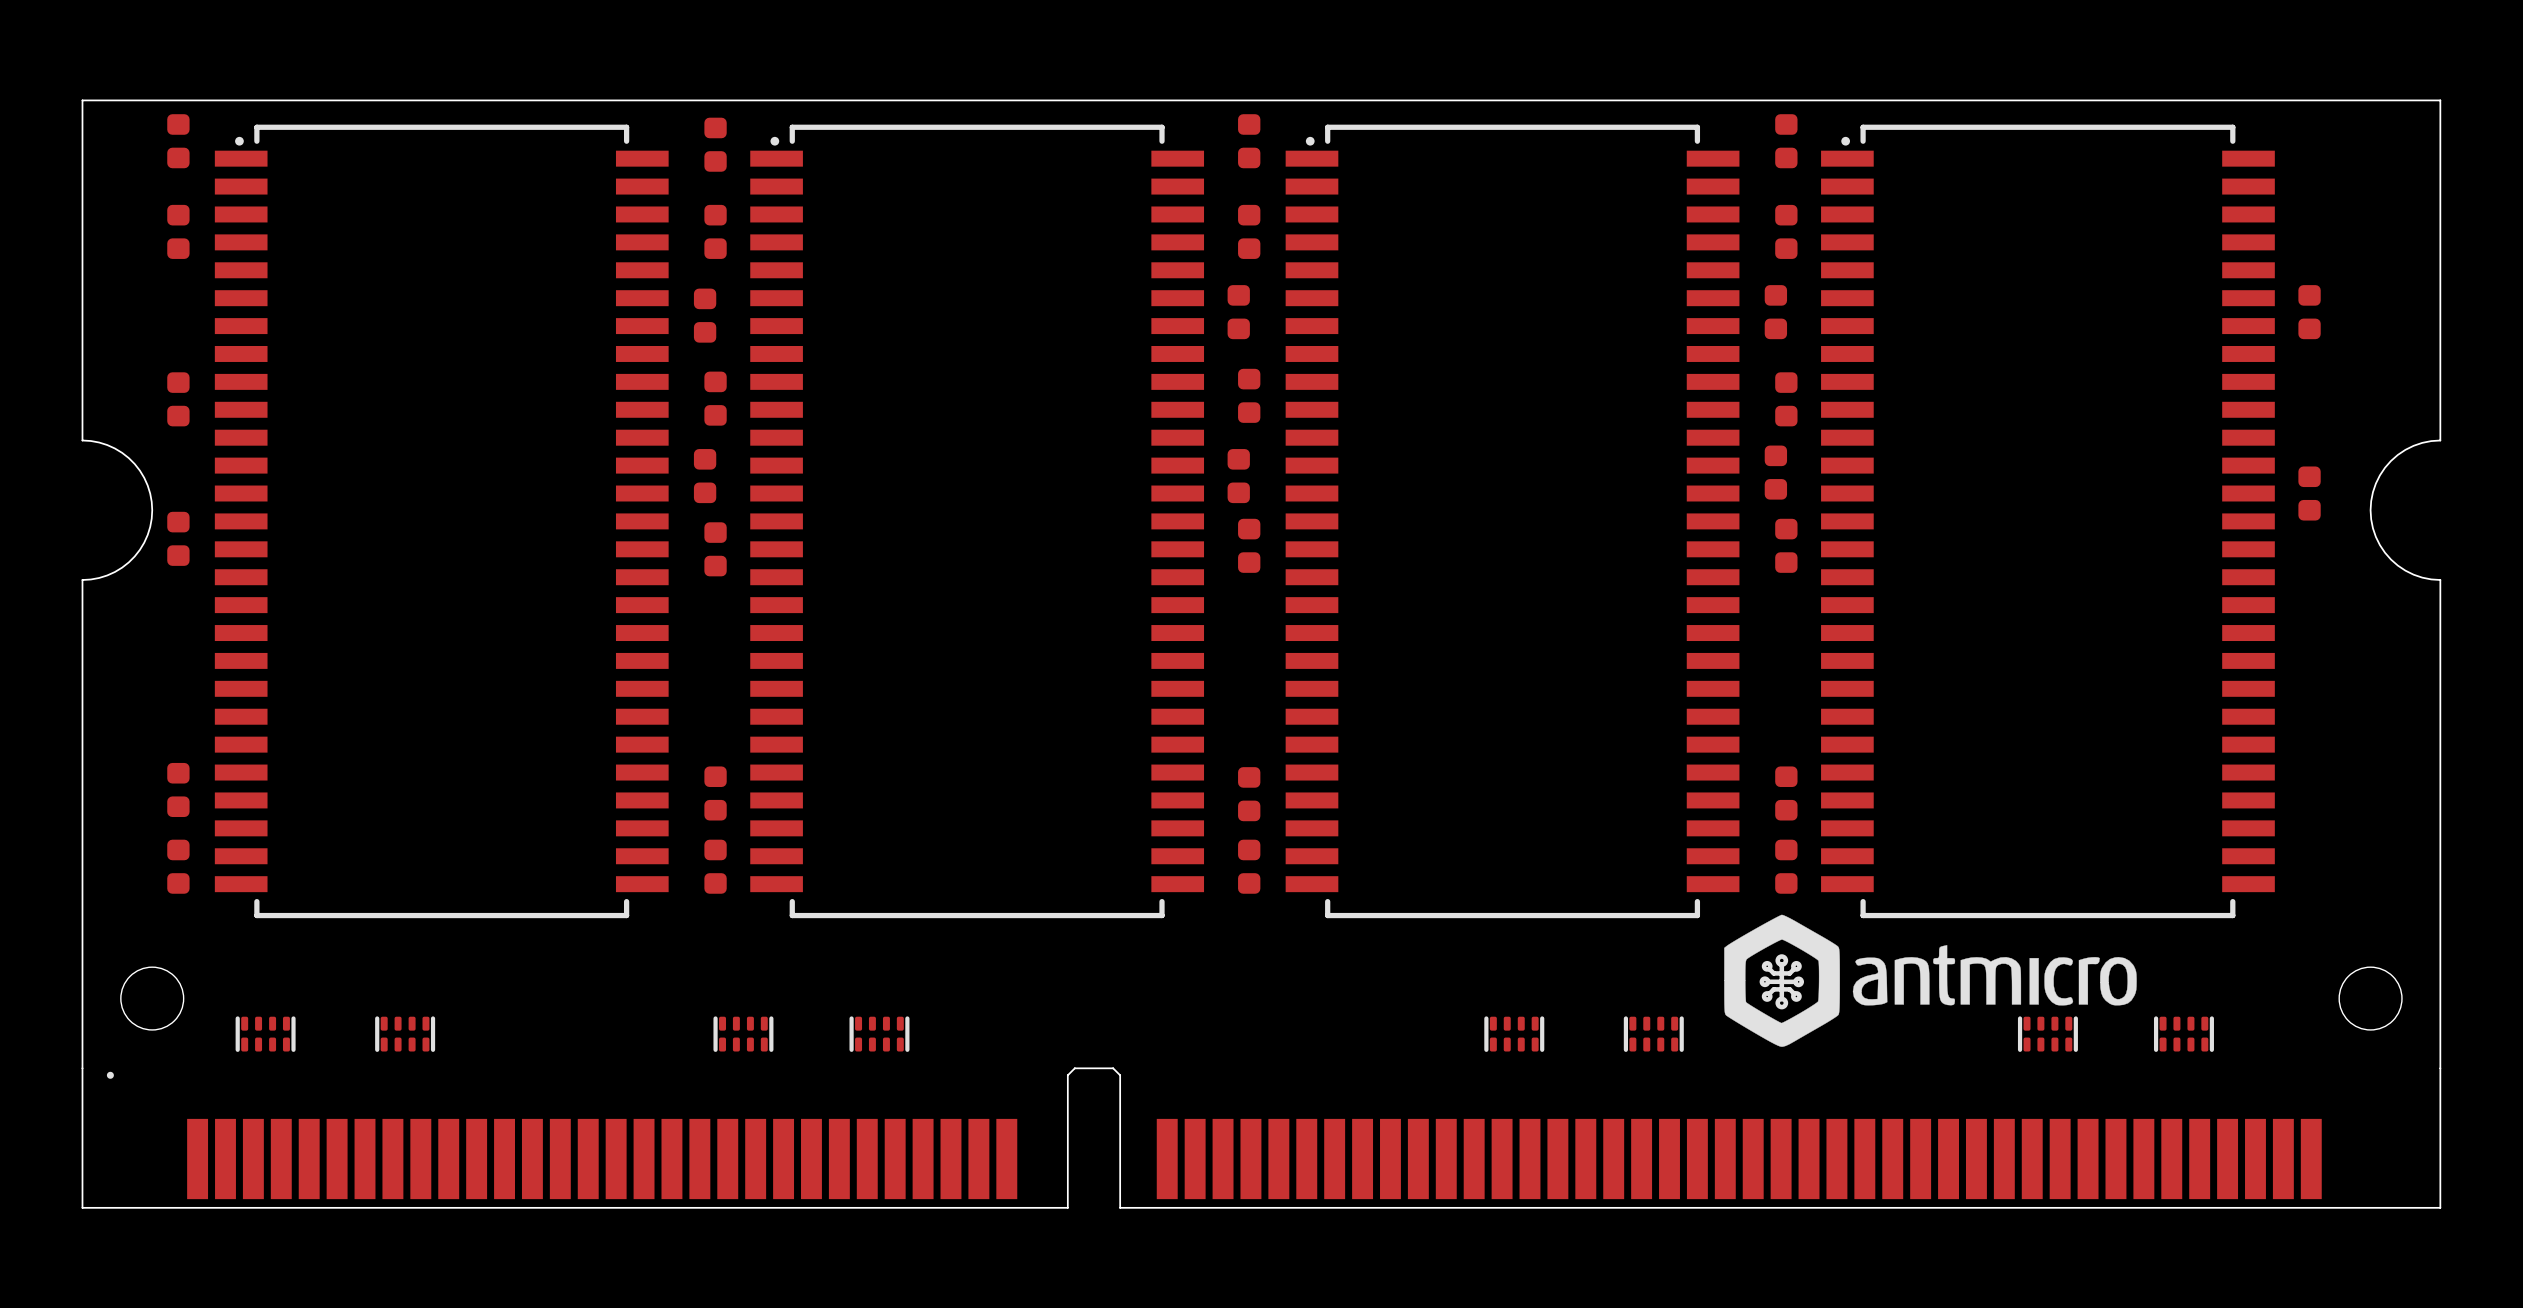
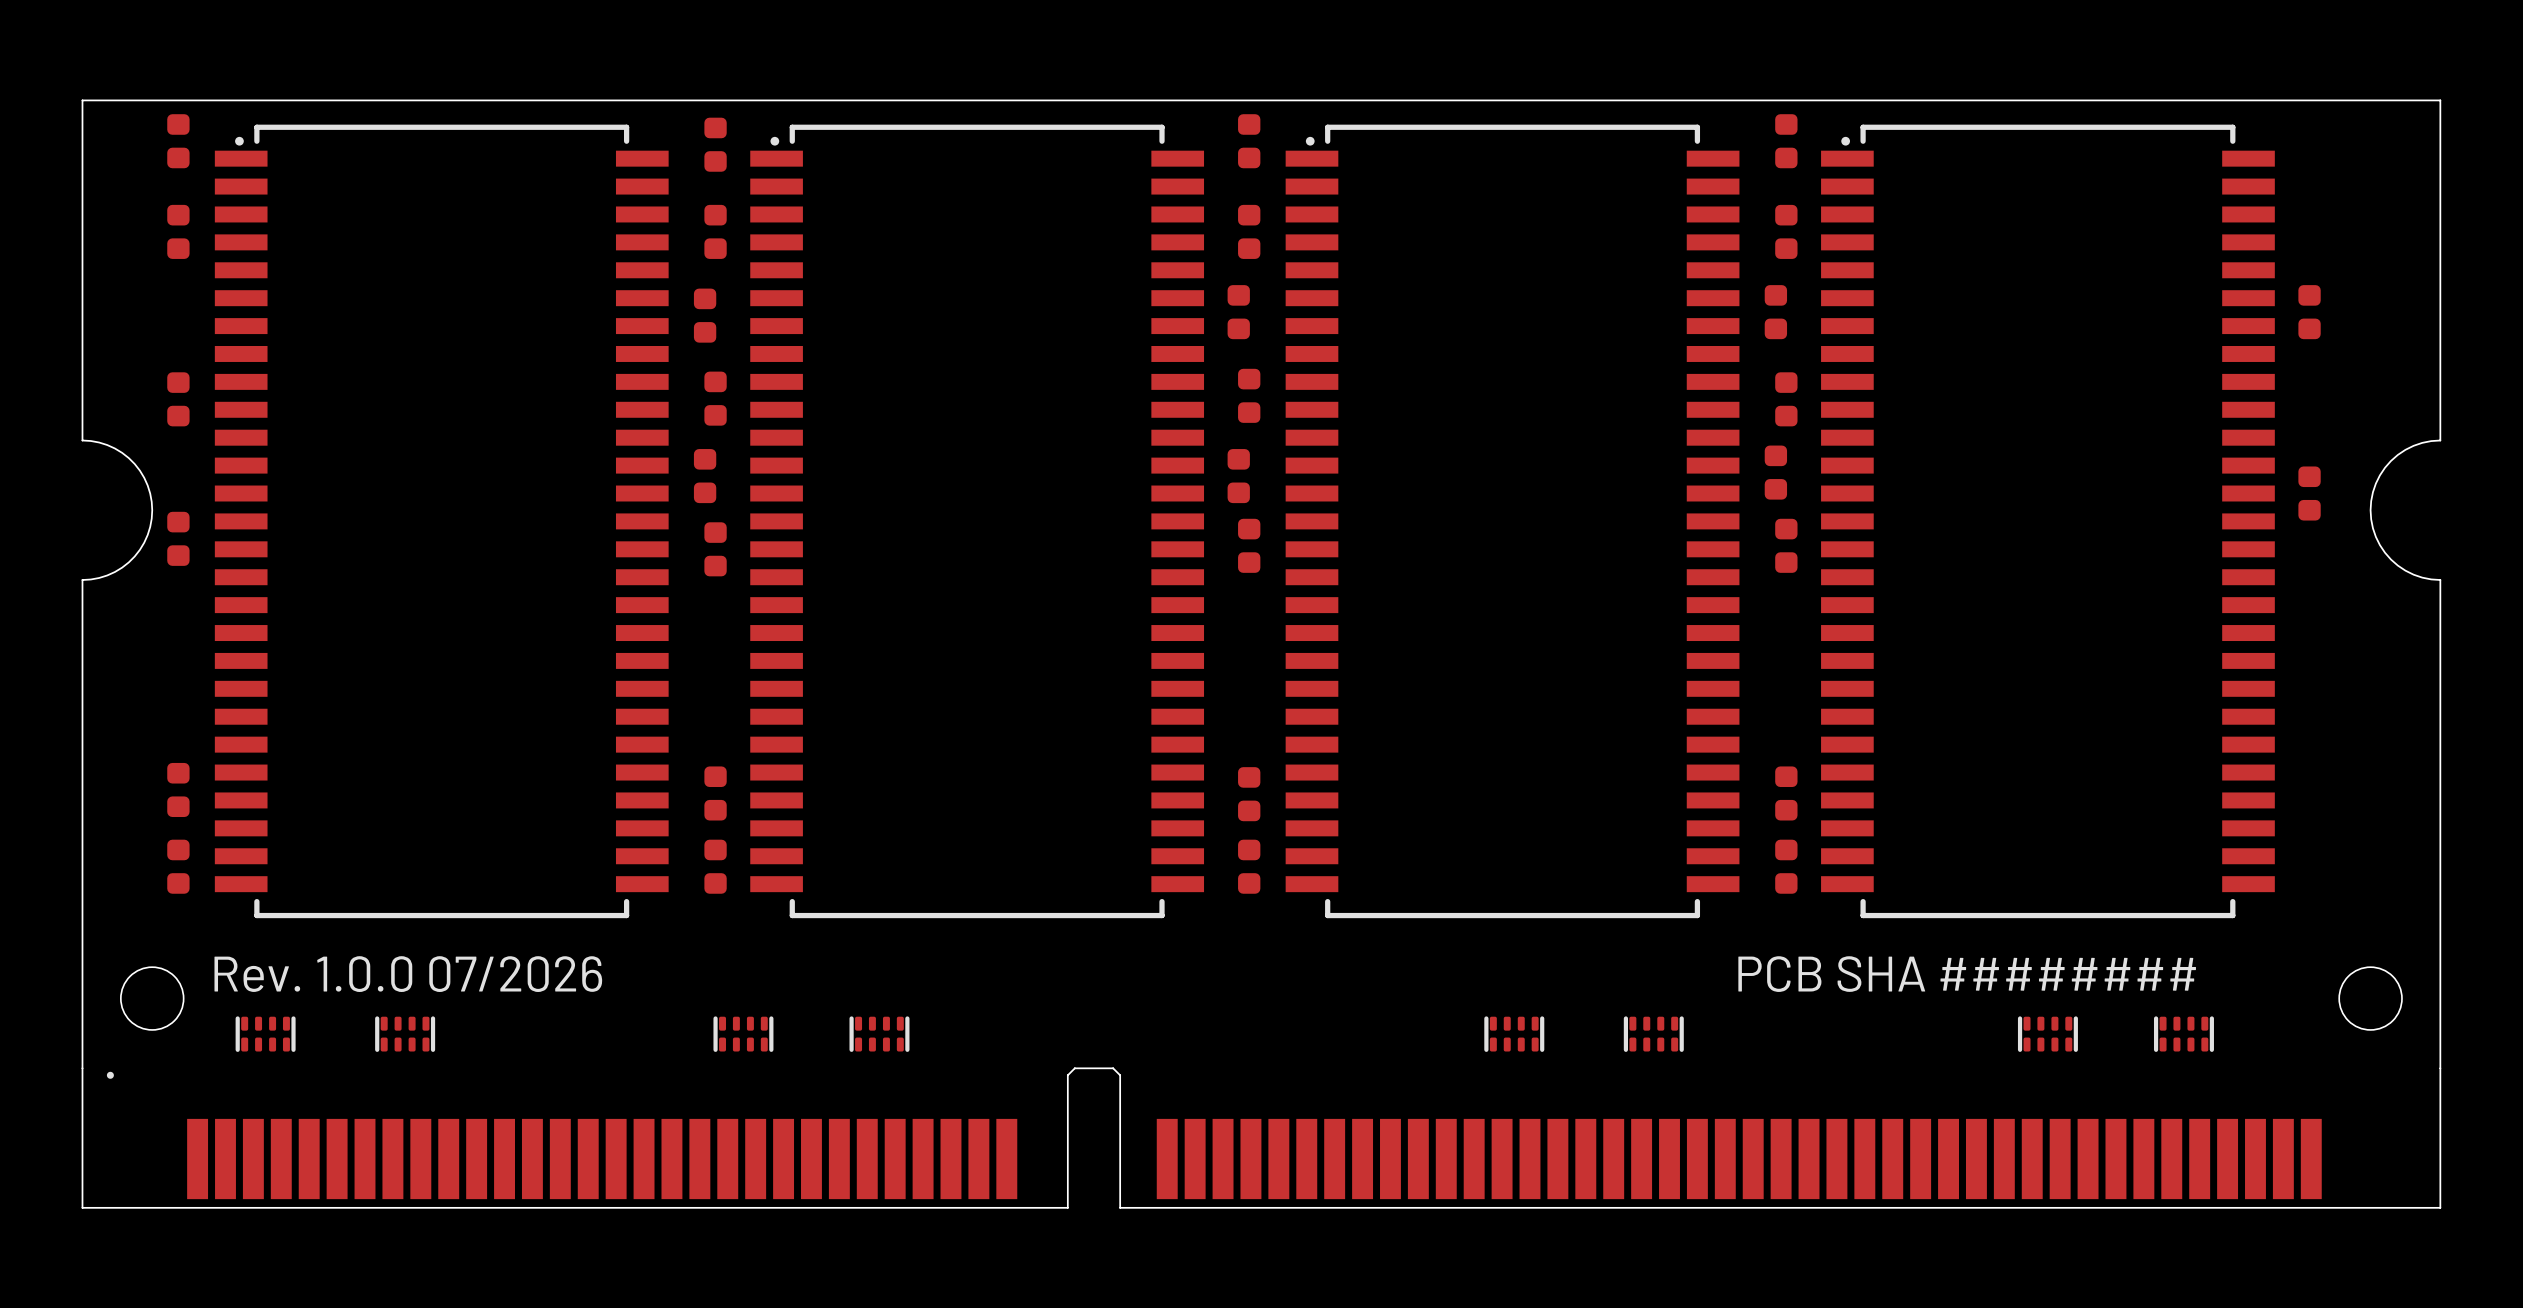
drawing: [1724, 914, 2137, 1047] -> none
text: none -> PCB SHA ######## (1967, 974)
text: none -> Rev. 1.0.0 07/2026 (408, 974)

